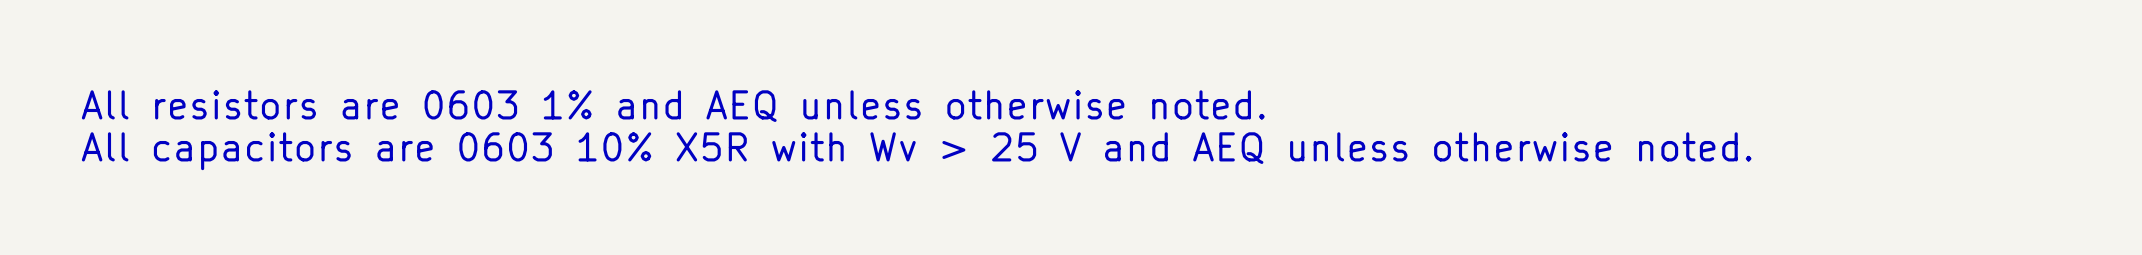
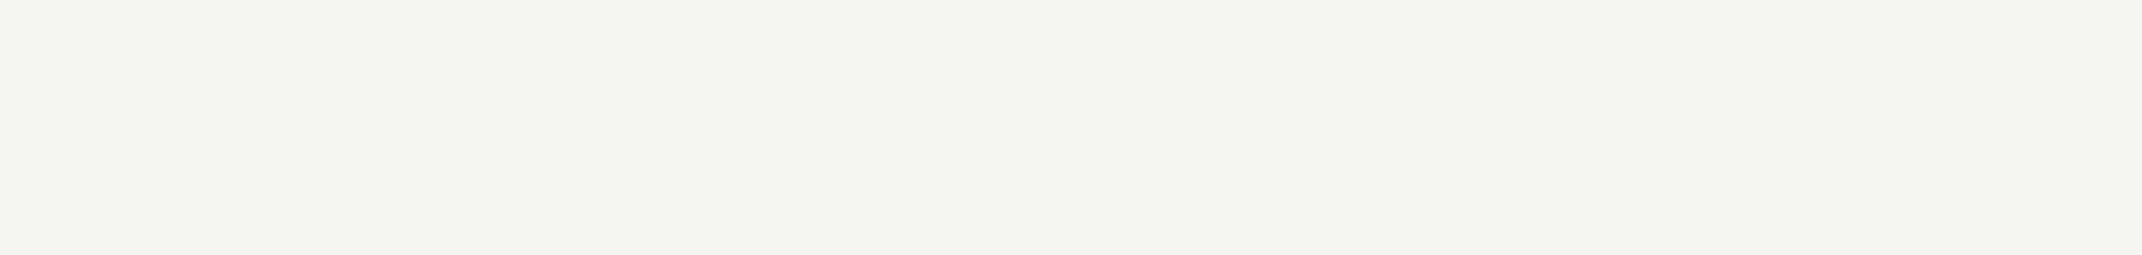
text: All resistors are 0603 1% and AEQ unless otherwise noted. (673, 106) -> none
text: All capacitors are 0603 10% X5R with Wv > 25 V and AEQ unless otherwise noted. (916, 151) -> none

